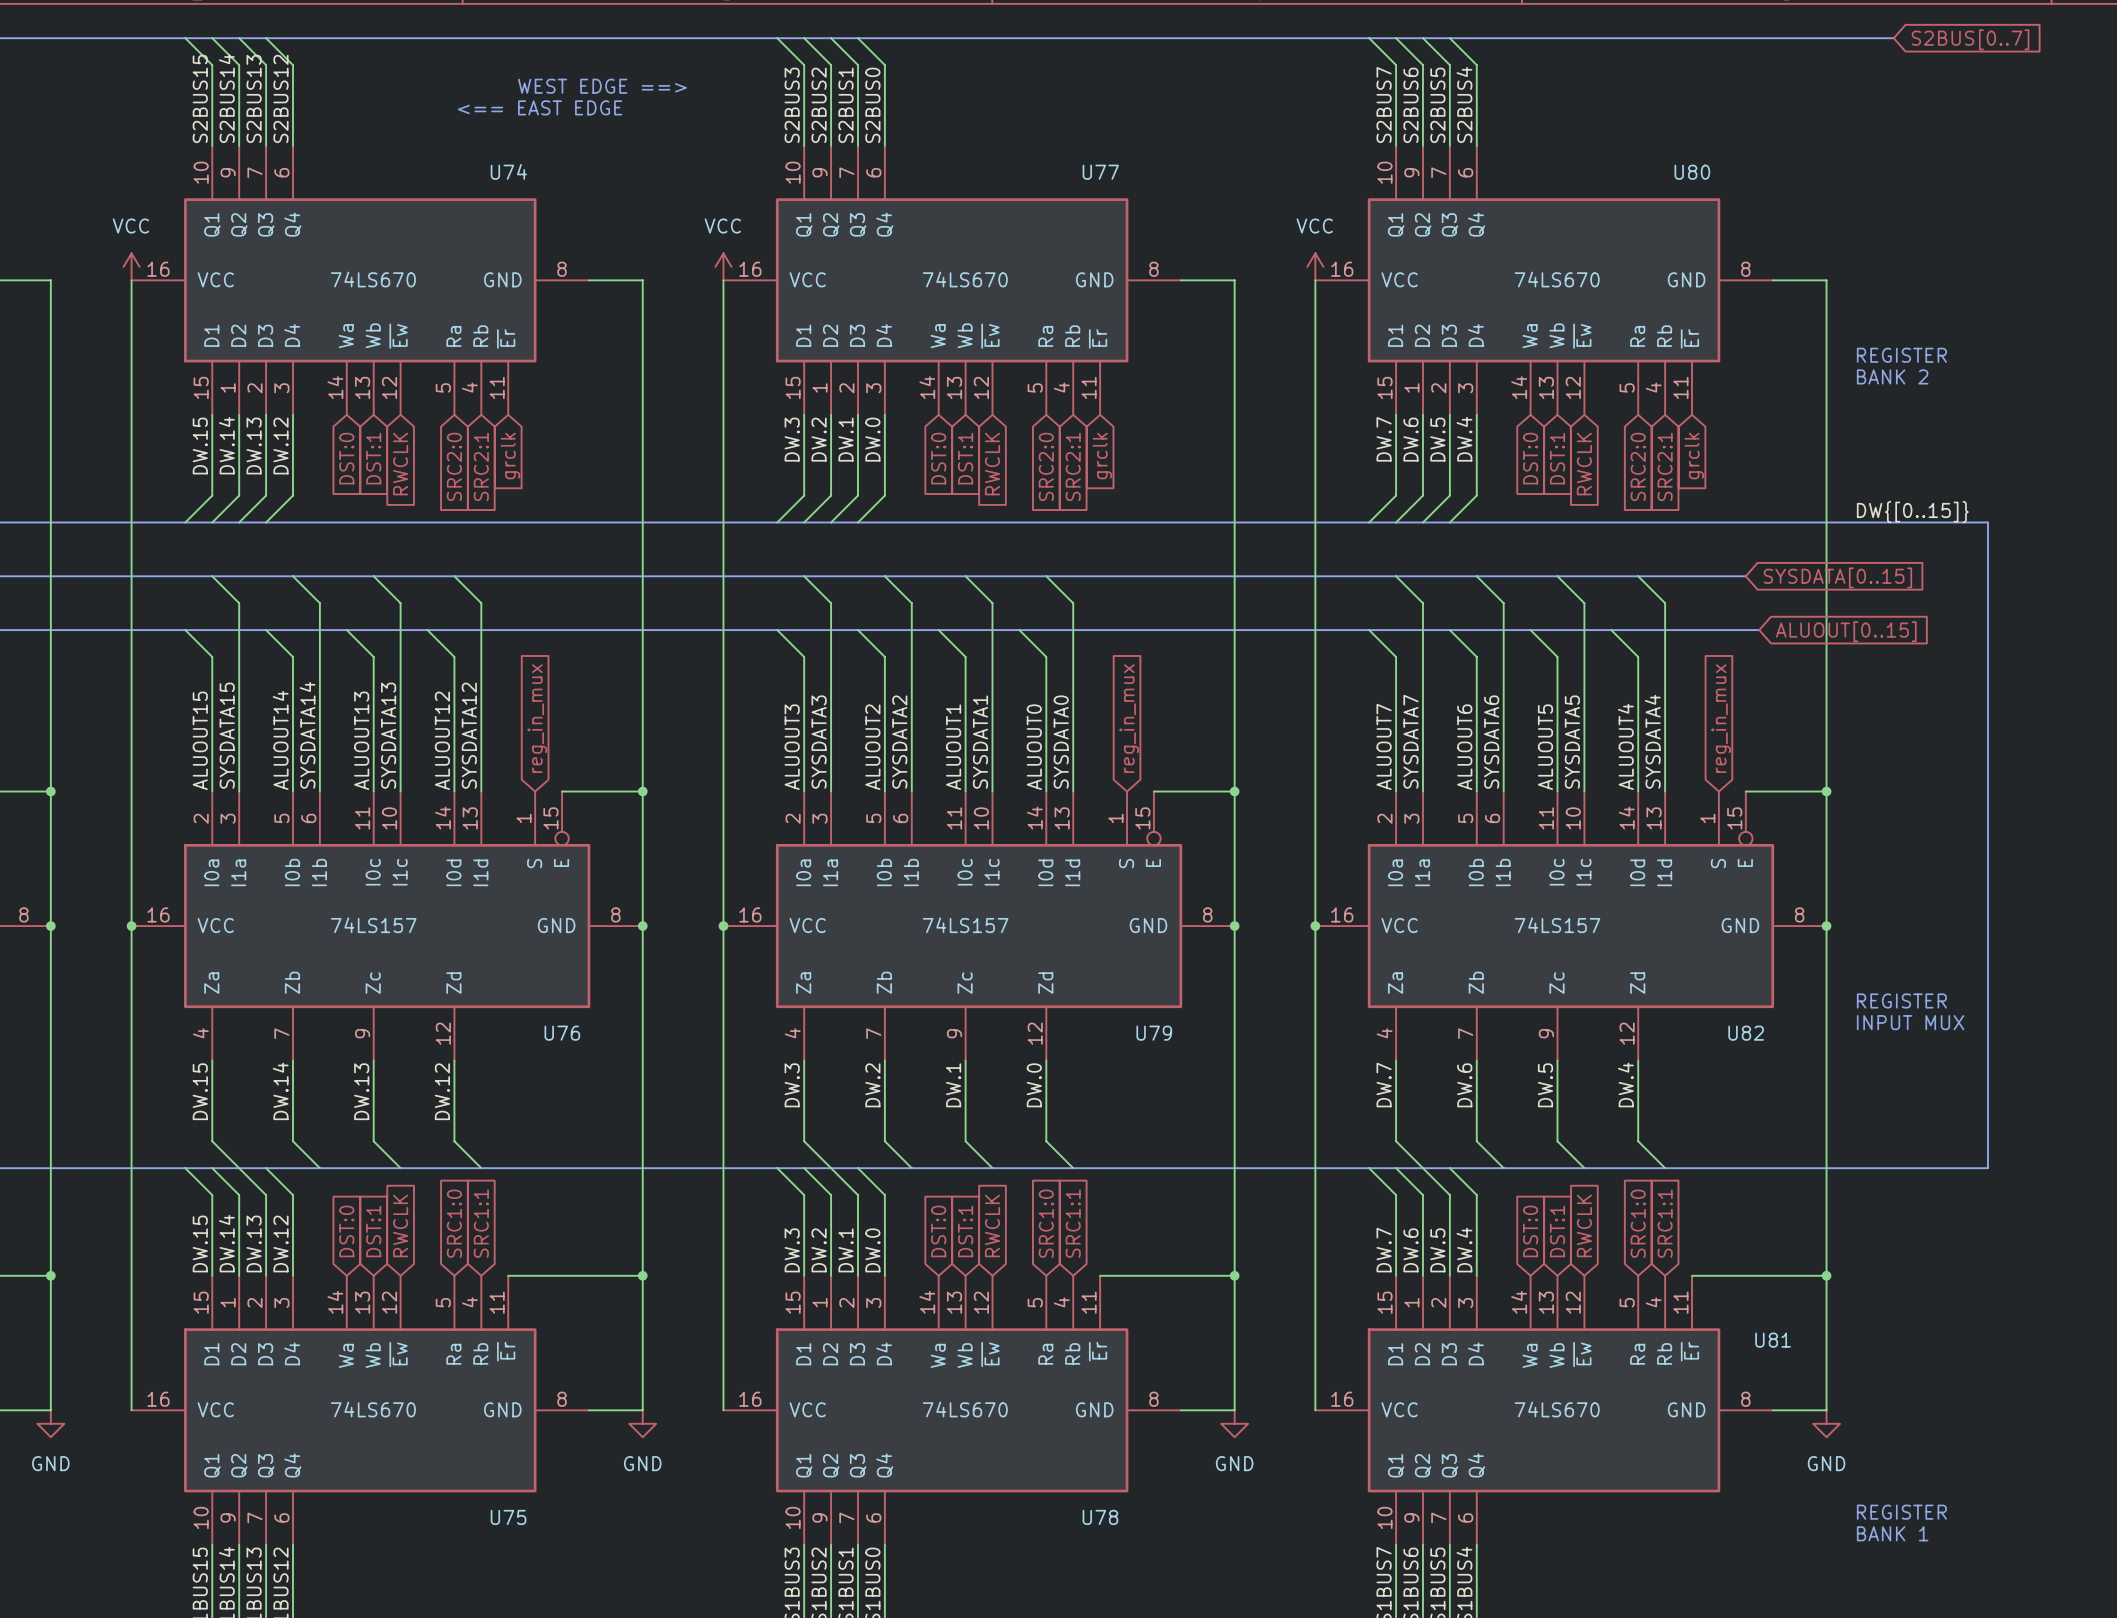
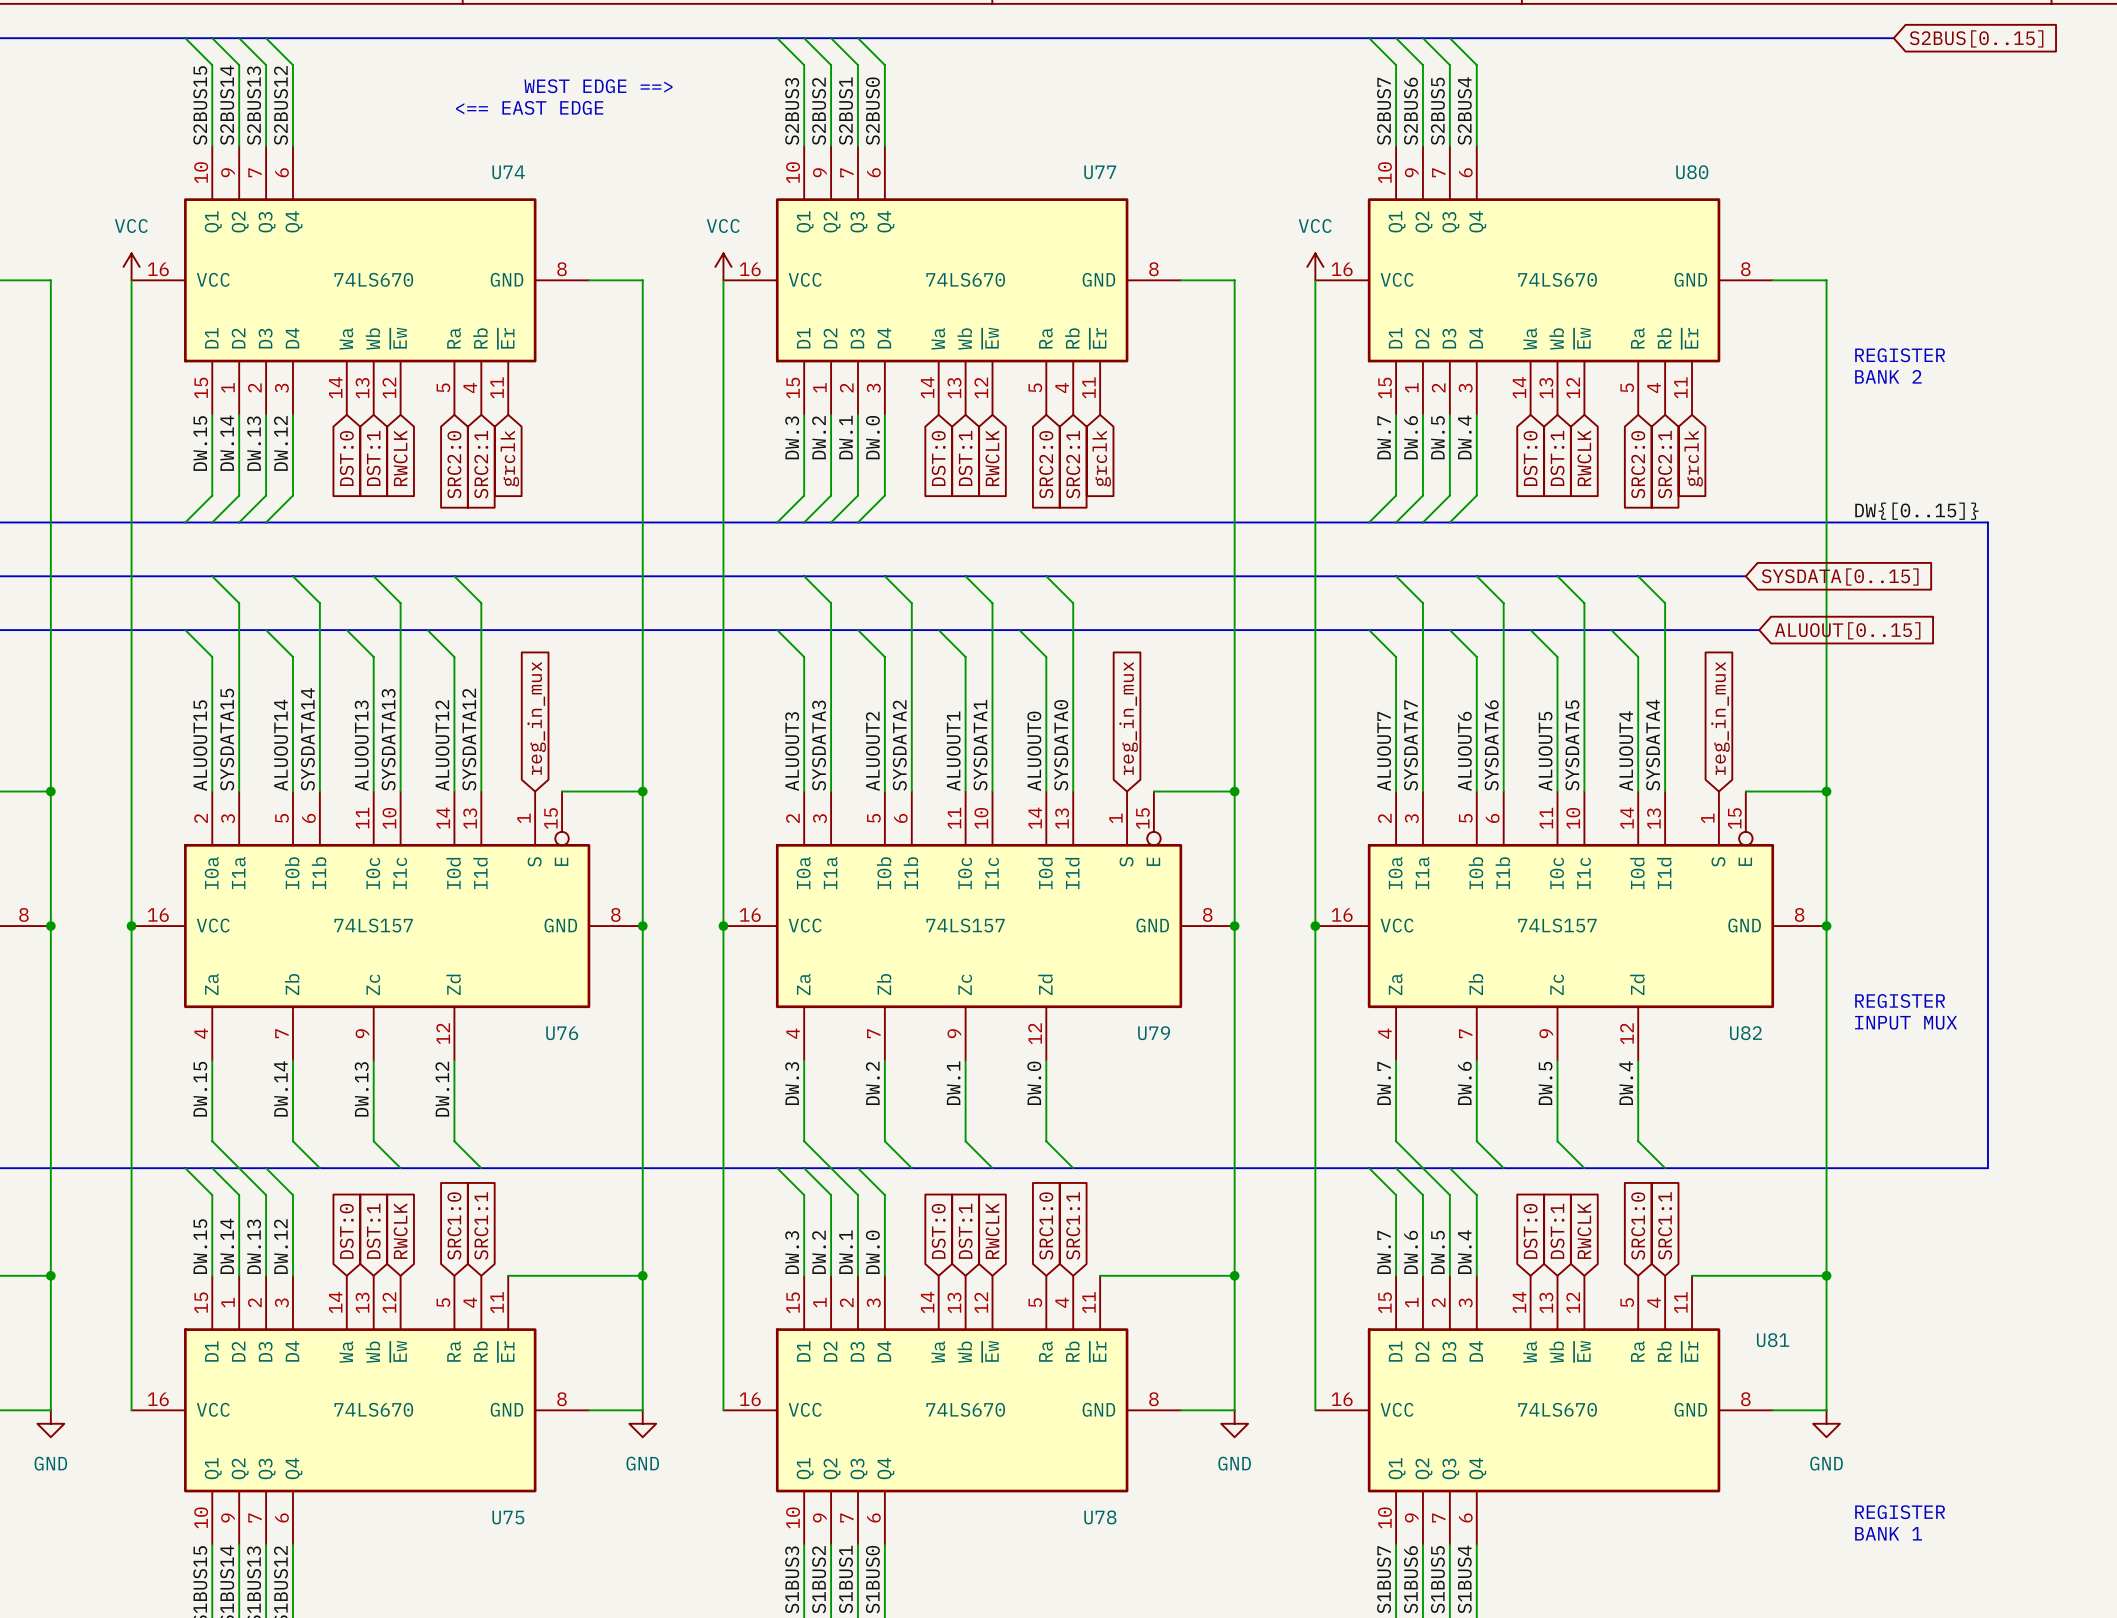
global label: S2BUS[0..7] (1970, 39) -> S2BUS[0..15] (1976, 38)

